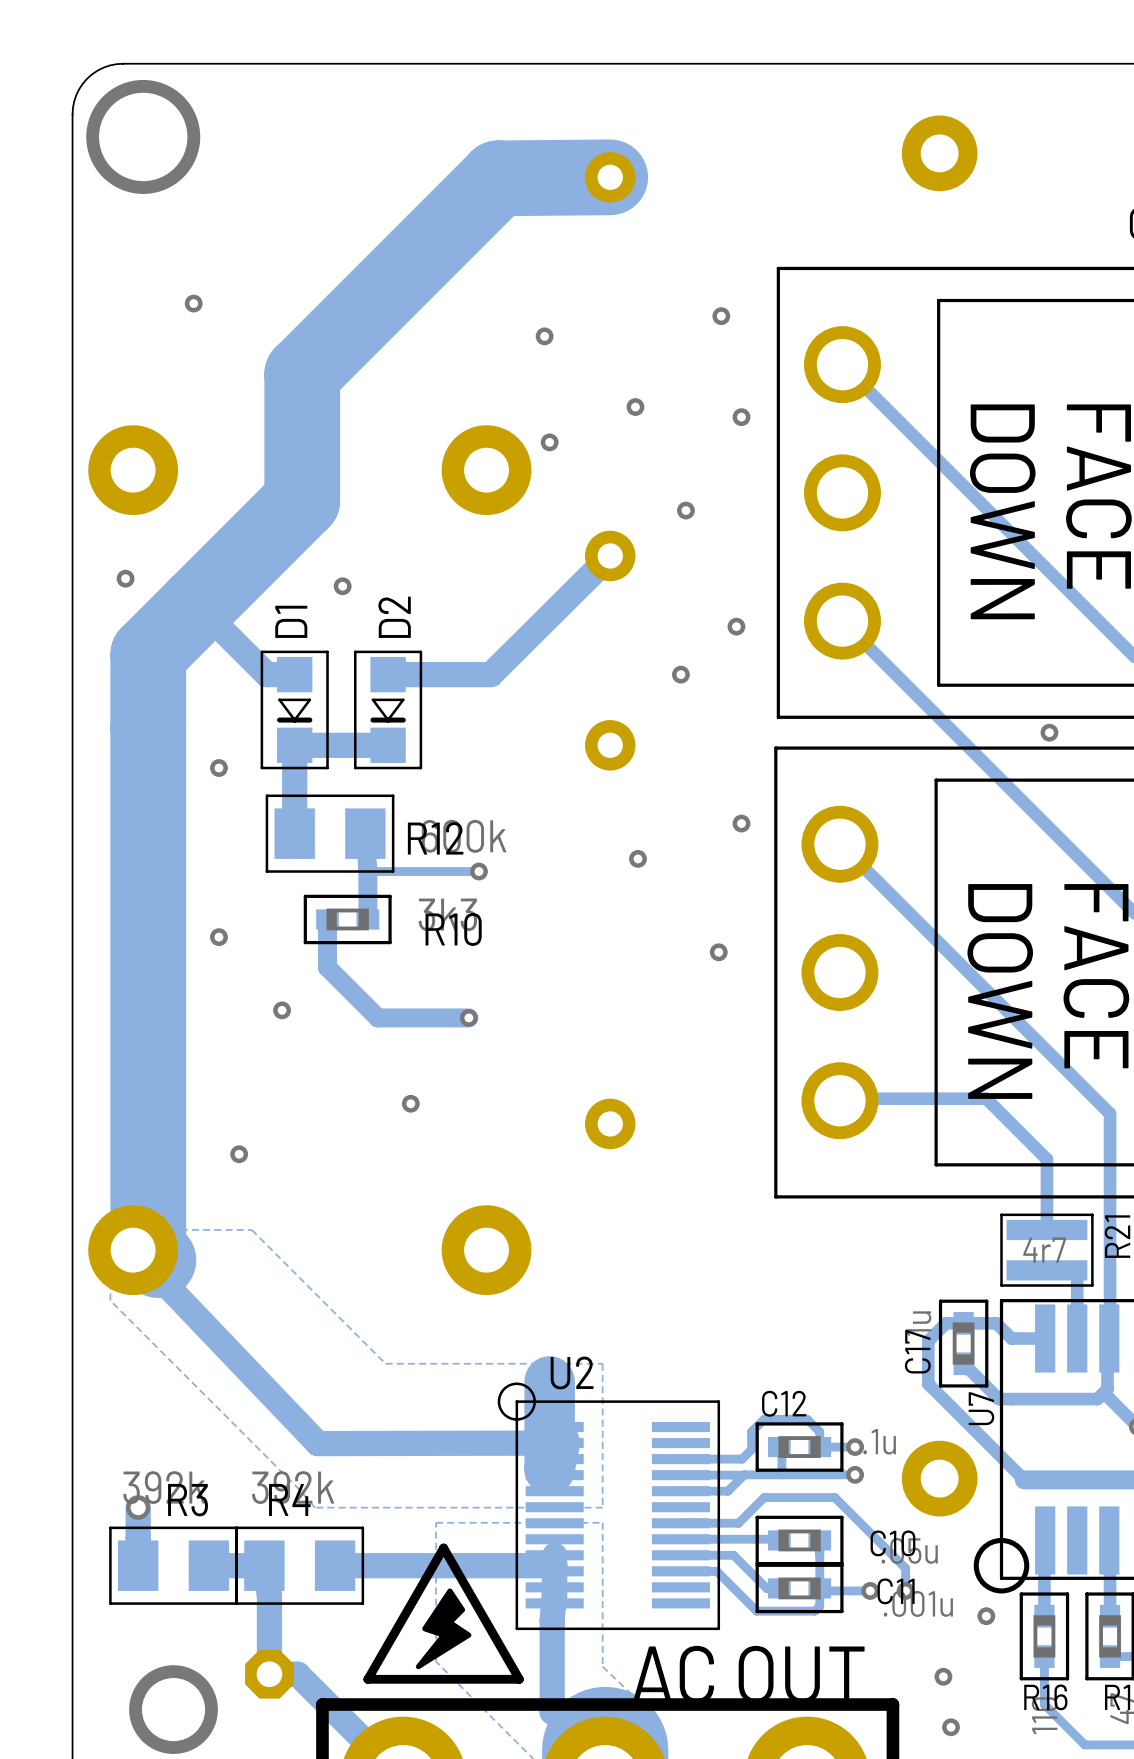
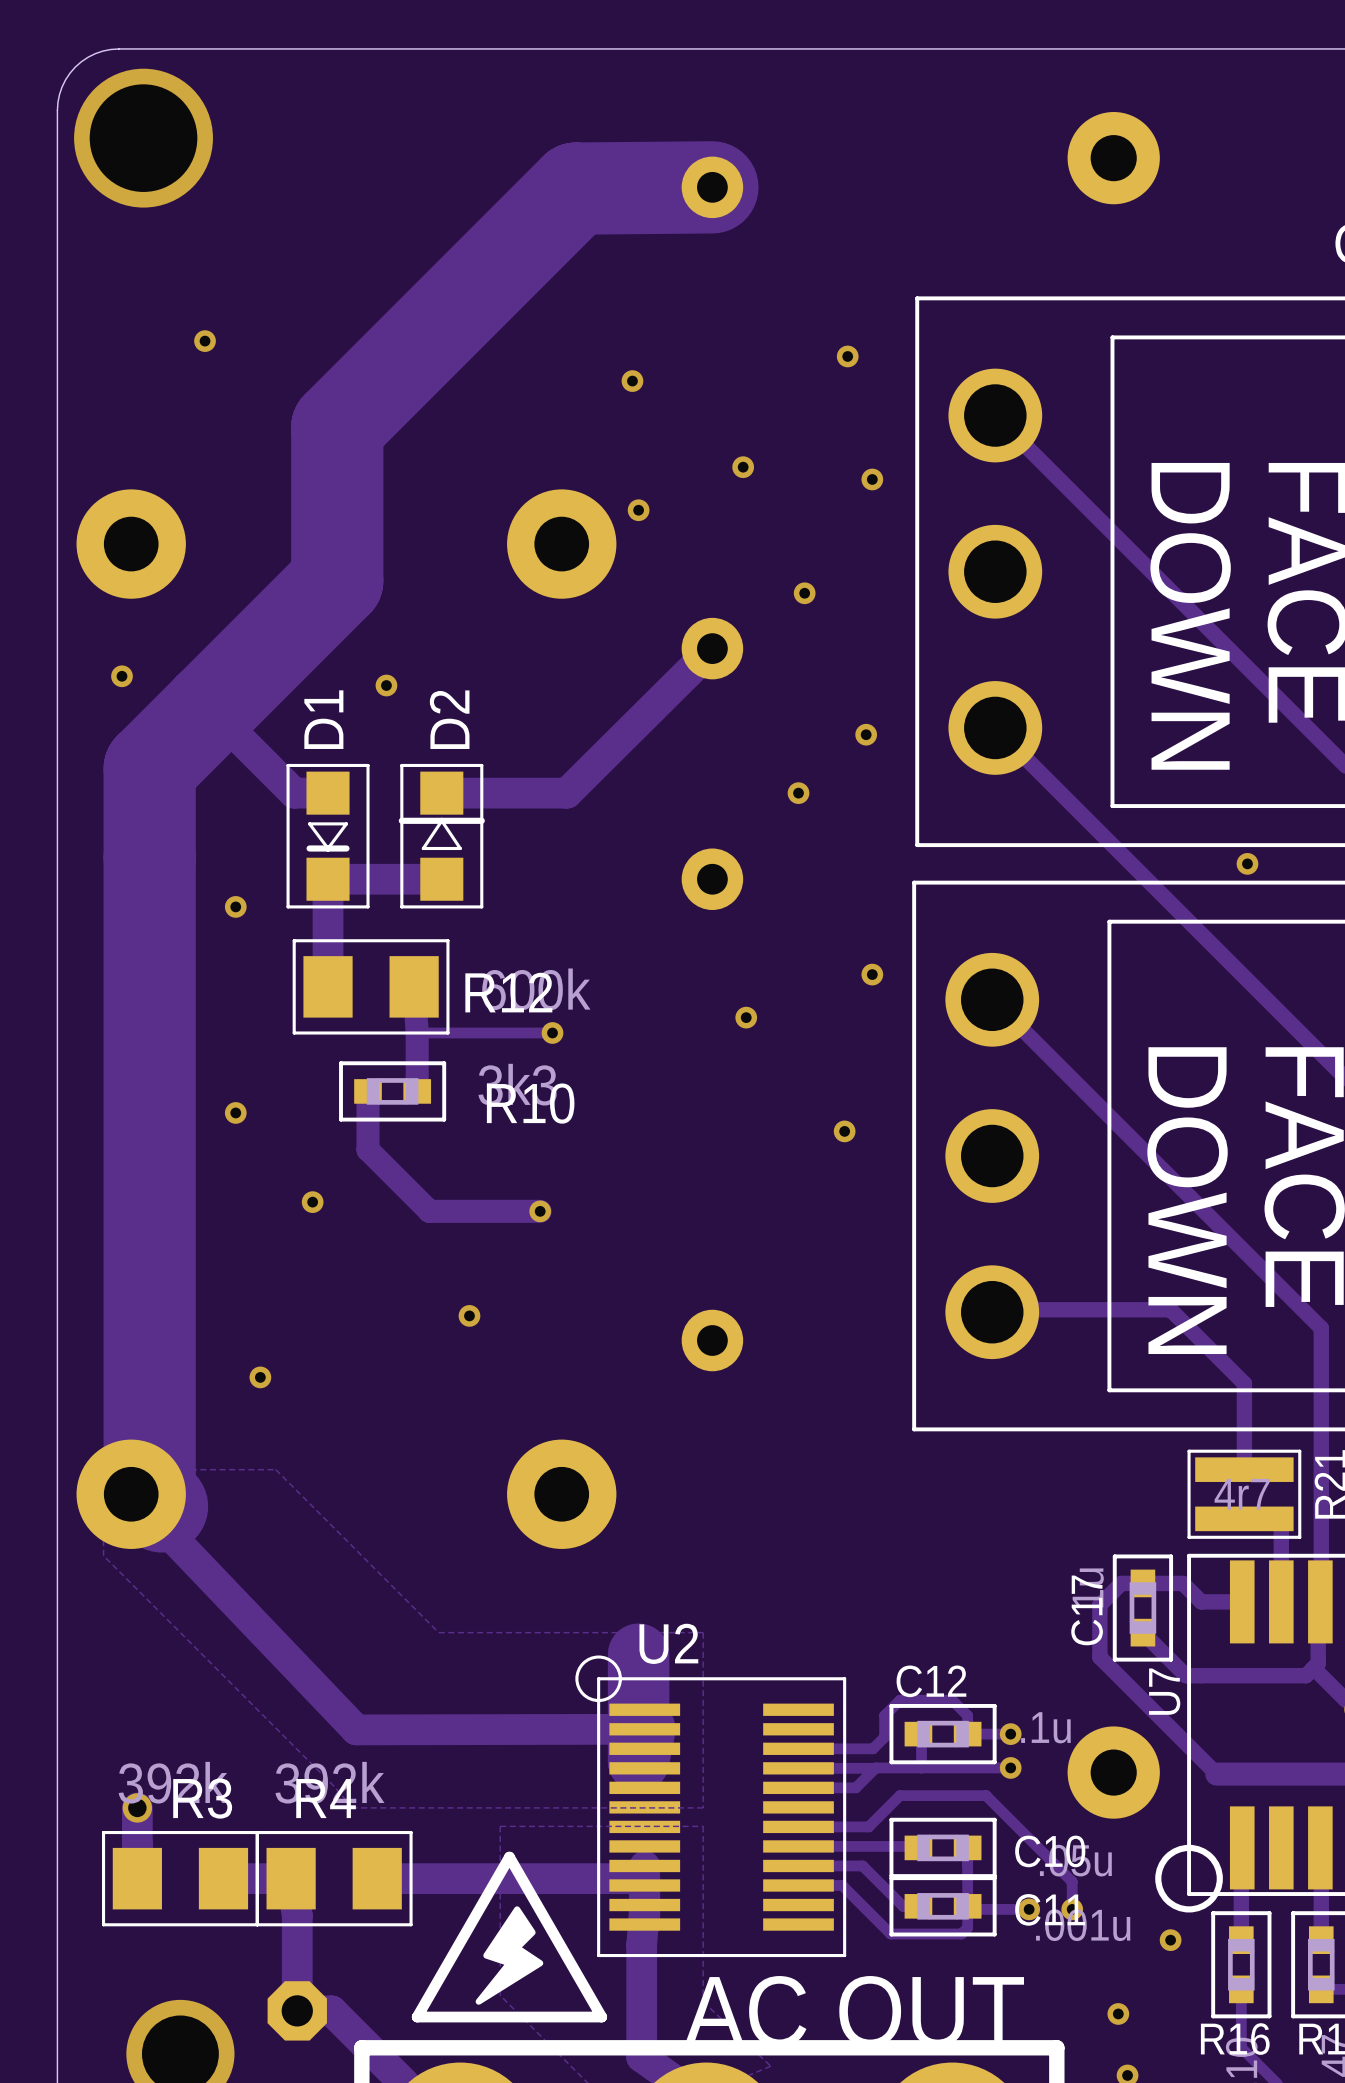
D2 footprint: [354, 650, 423, 770] -> [398, 763, 485, 909]

